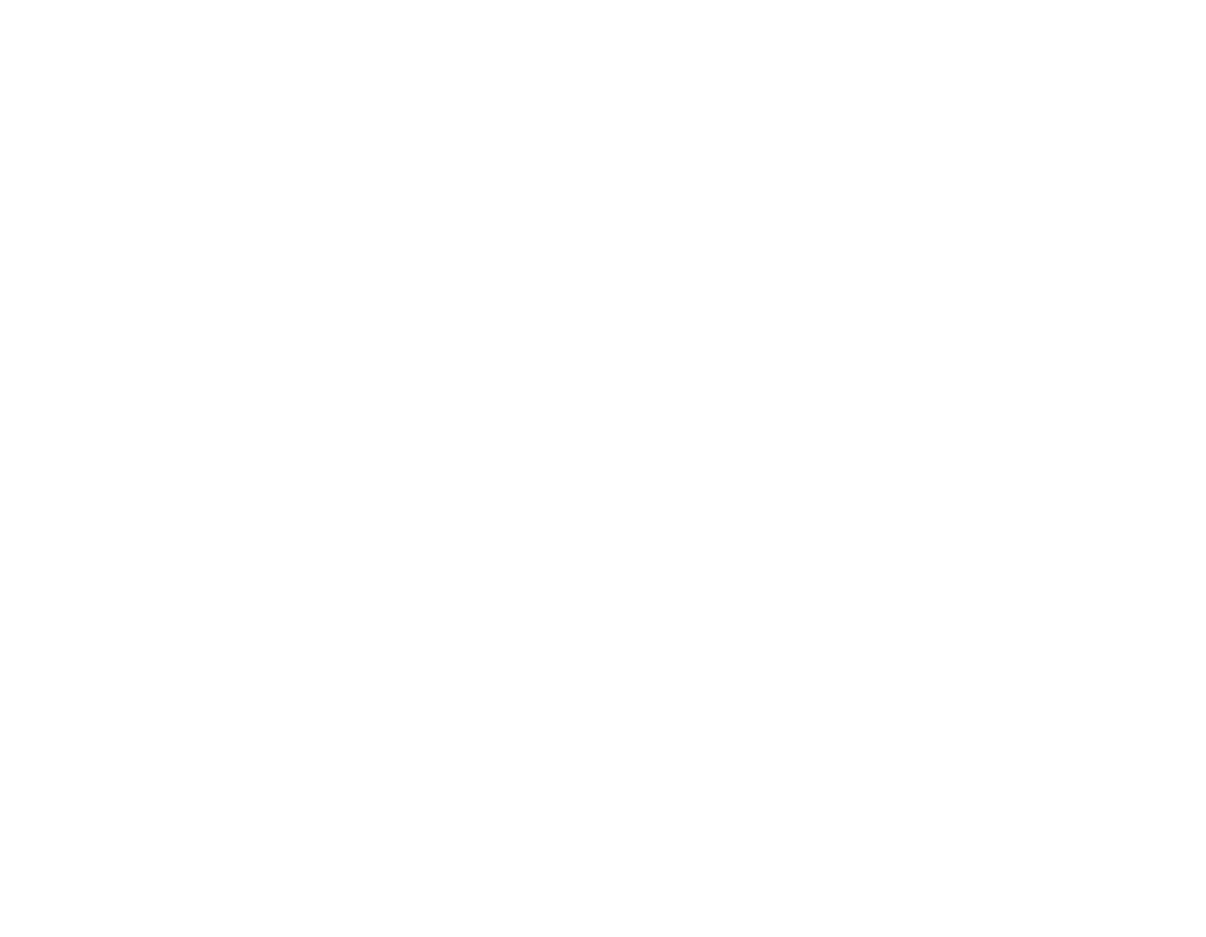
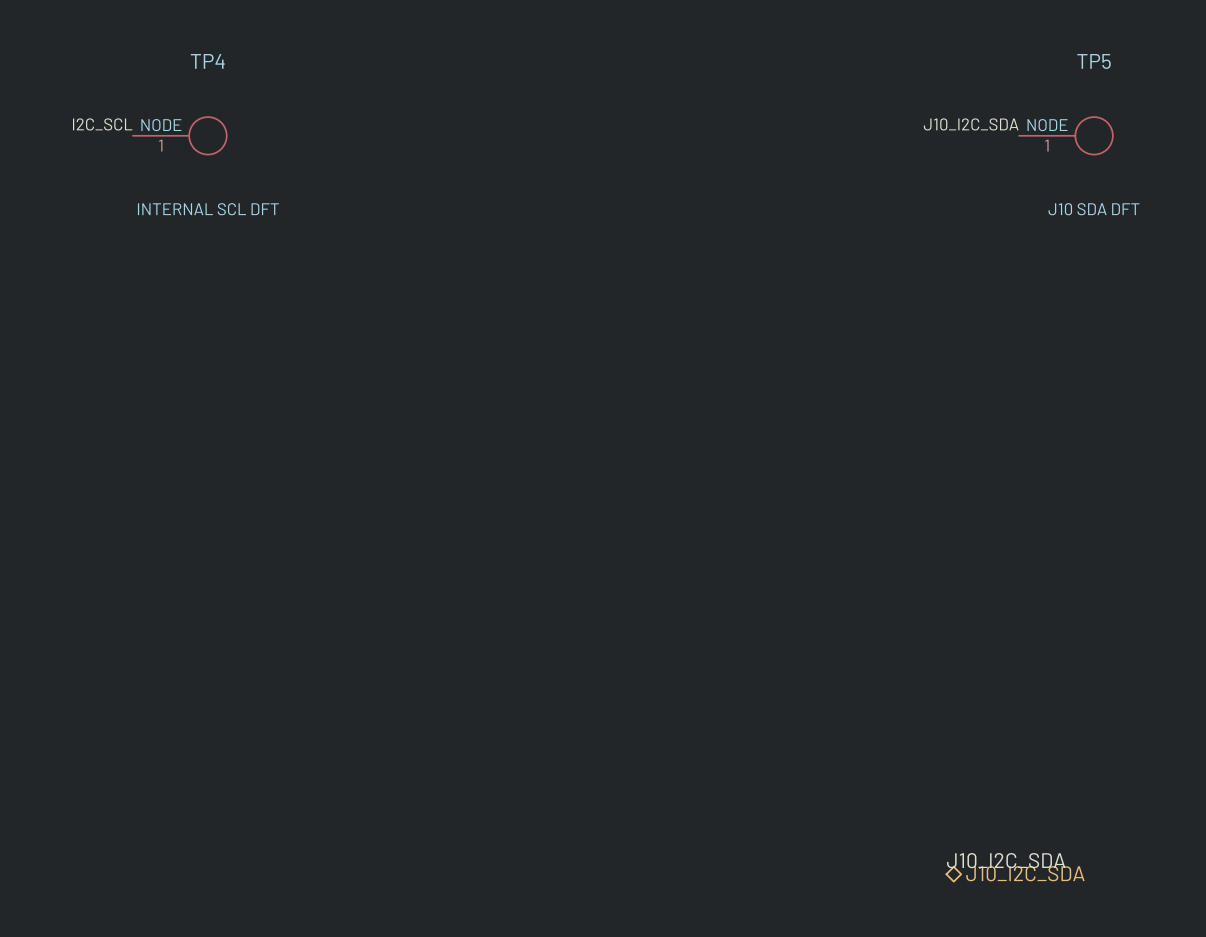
label: none -> I2C_SCL (102, 124)
label: none -> J10_I2C_SDA (971, 124)
TP4: none -> INTERNAL SCL DFT (179, 135)
TP5: none -> J10 SDA DFT (1065, 135)
label: none -> J10_I2C_SDA (1006, 860)
hierarchical label: none -> J10_I2C_SDA (1025, 873)

